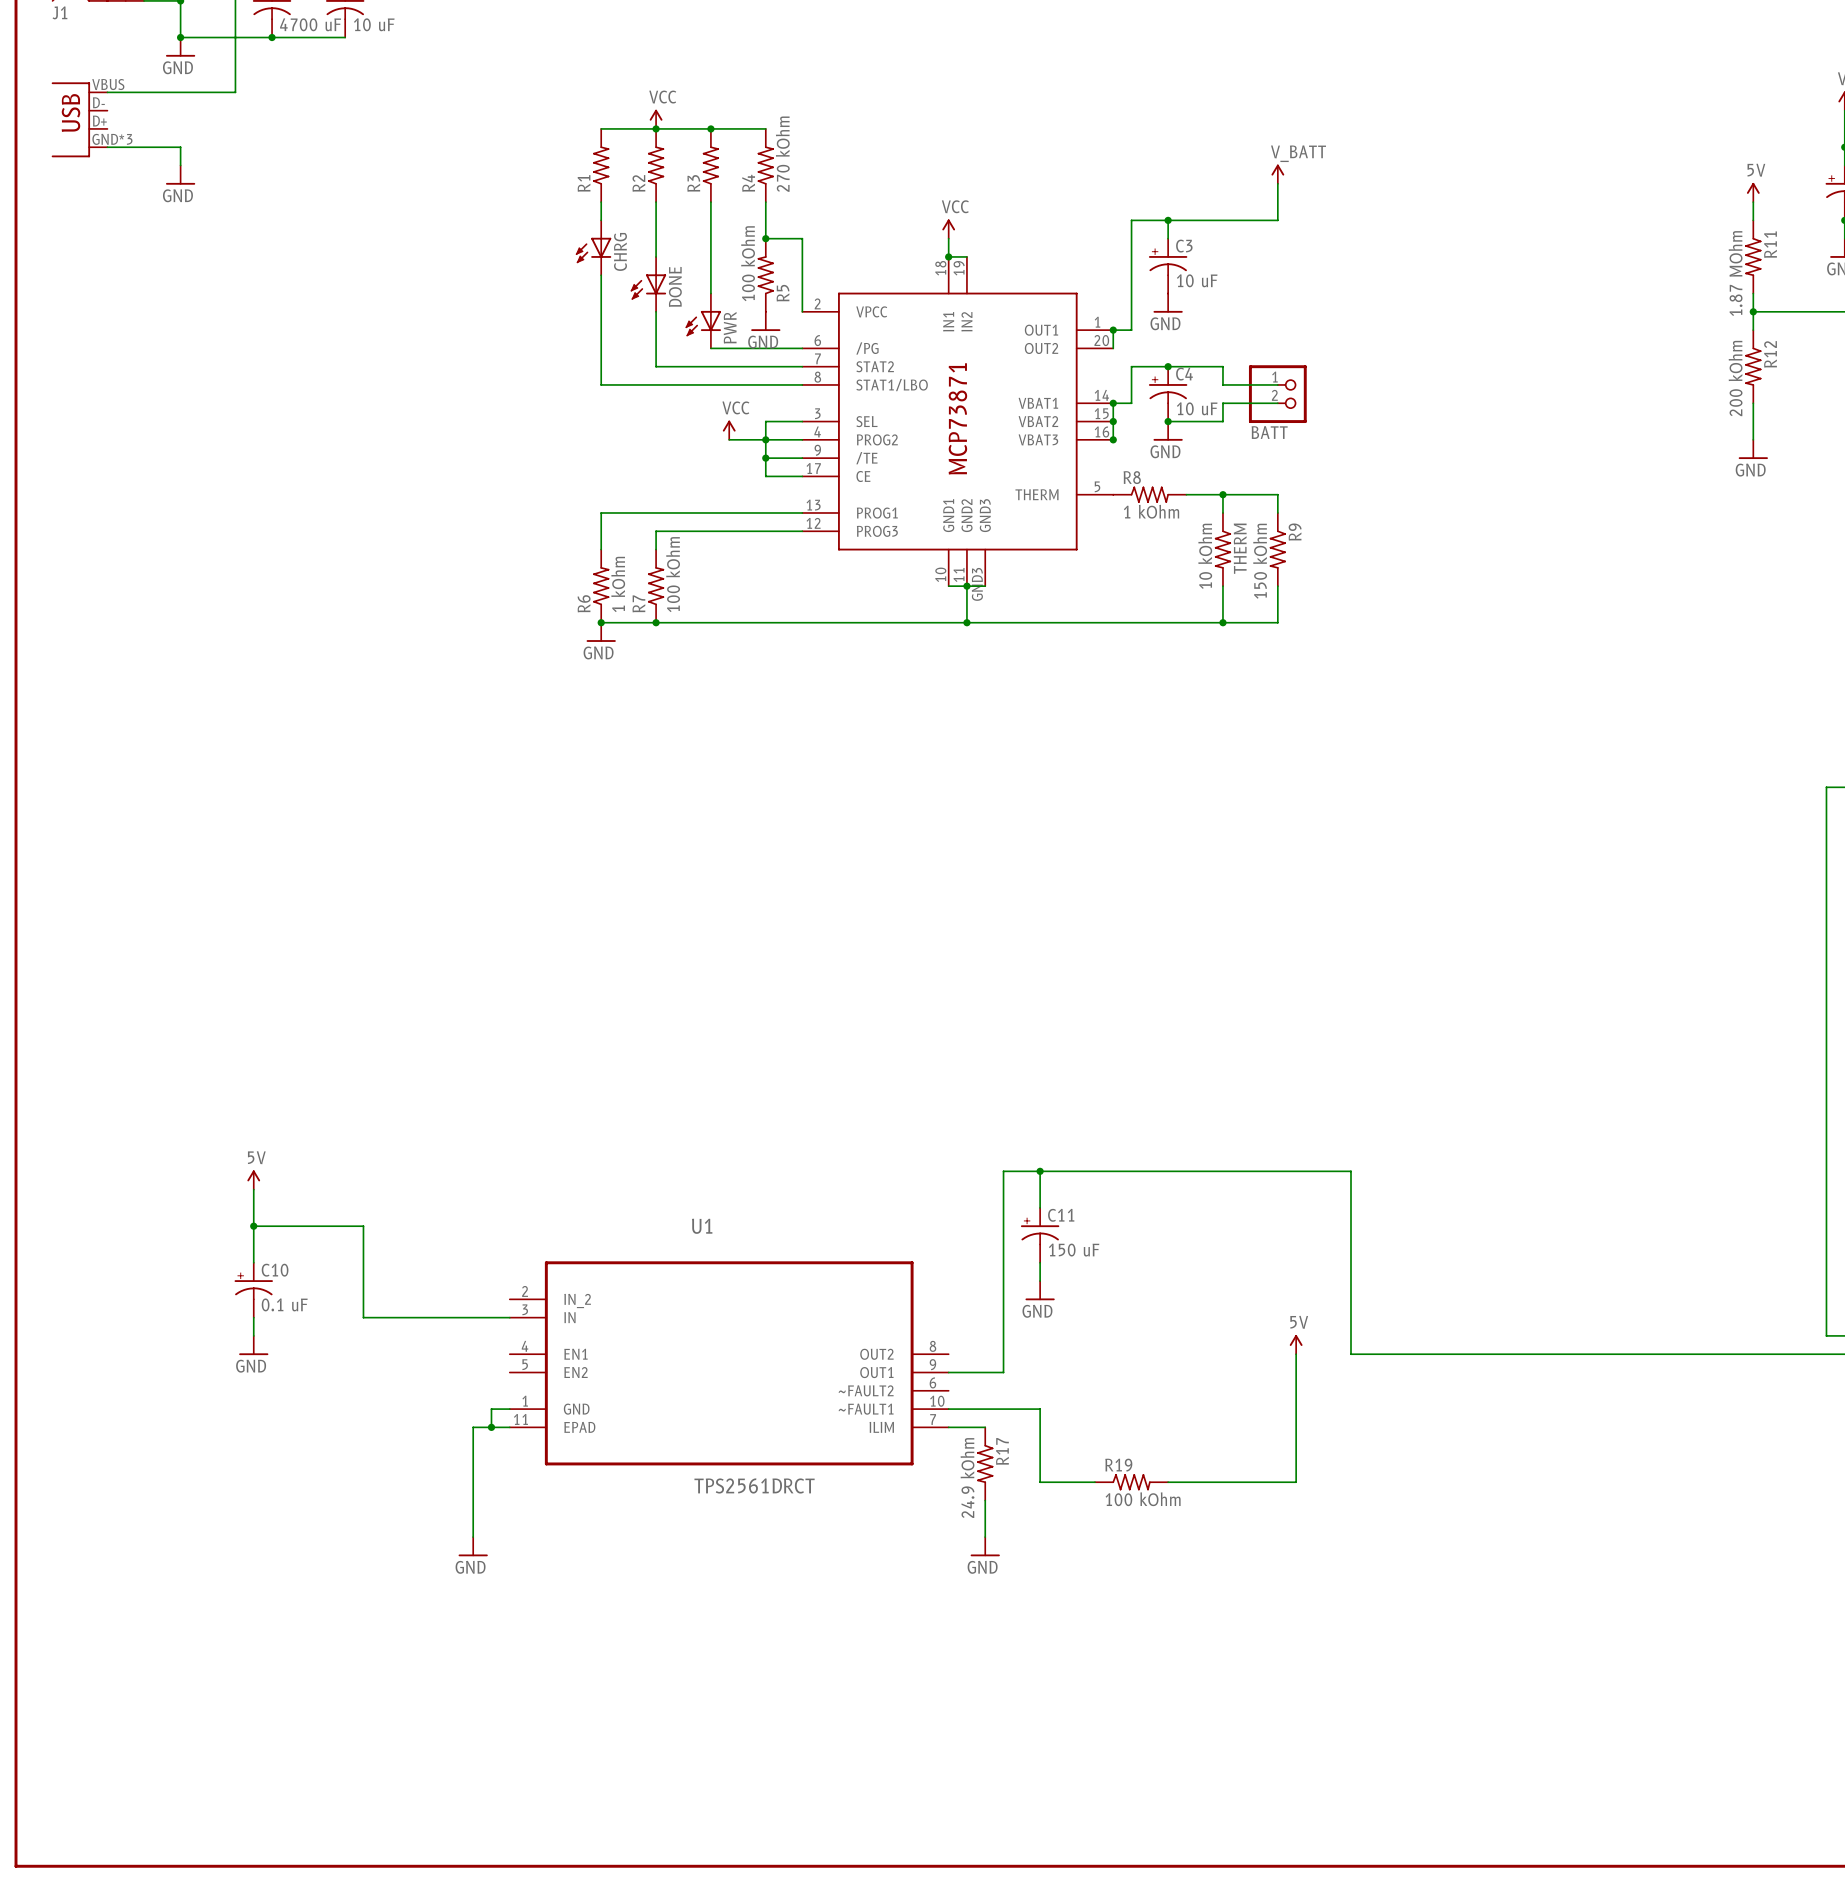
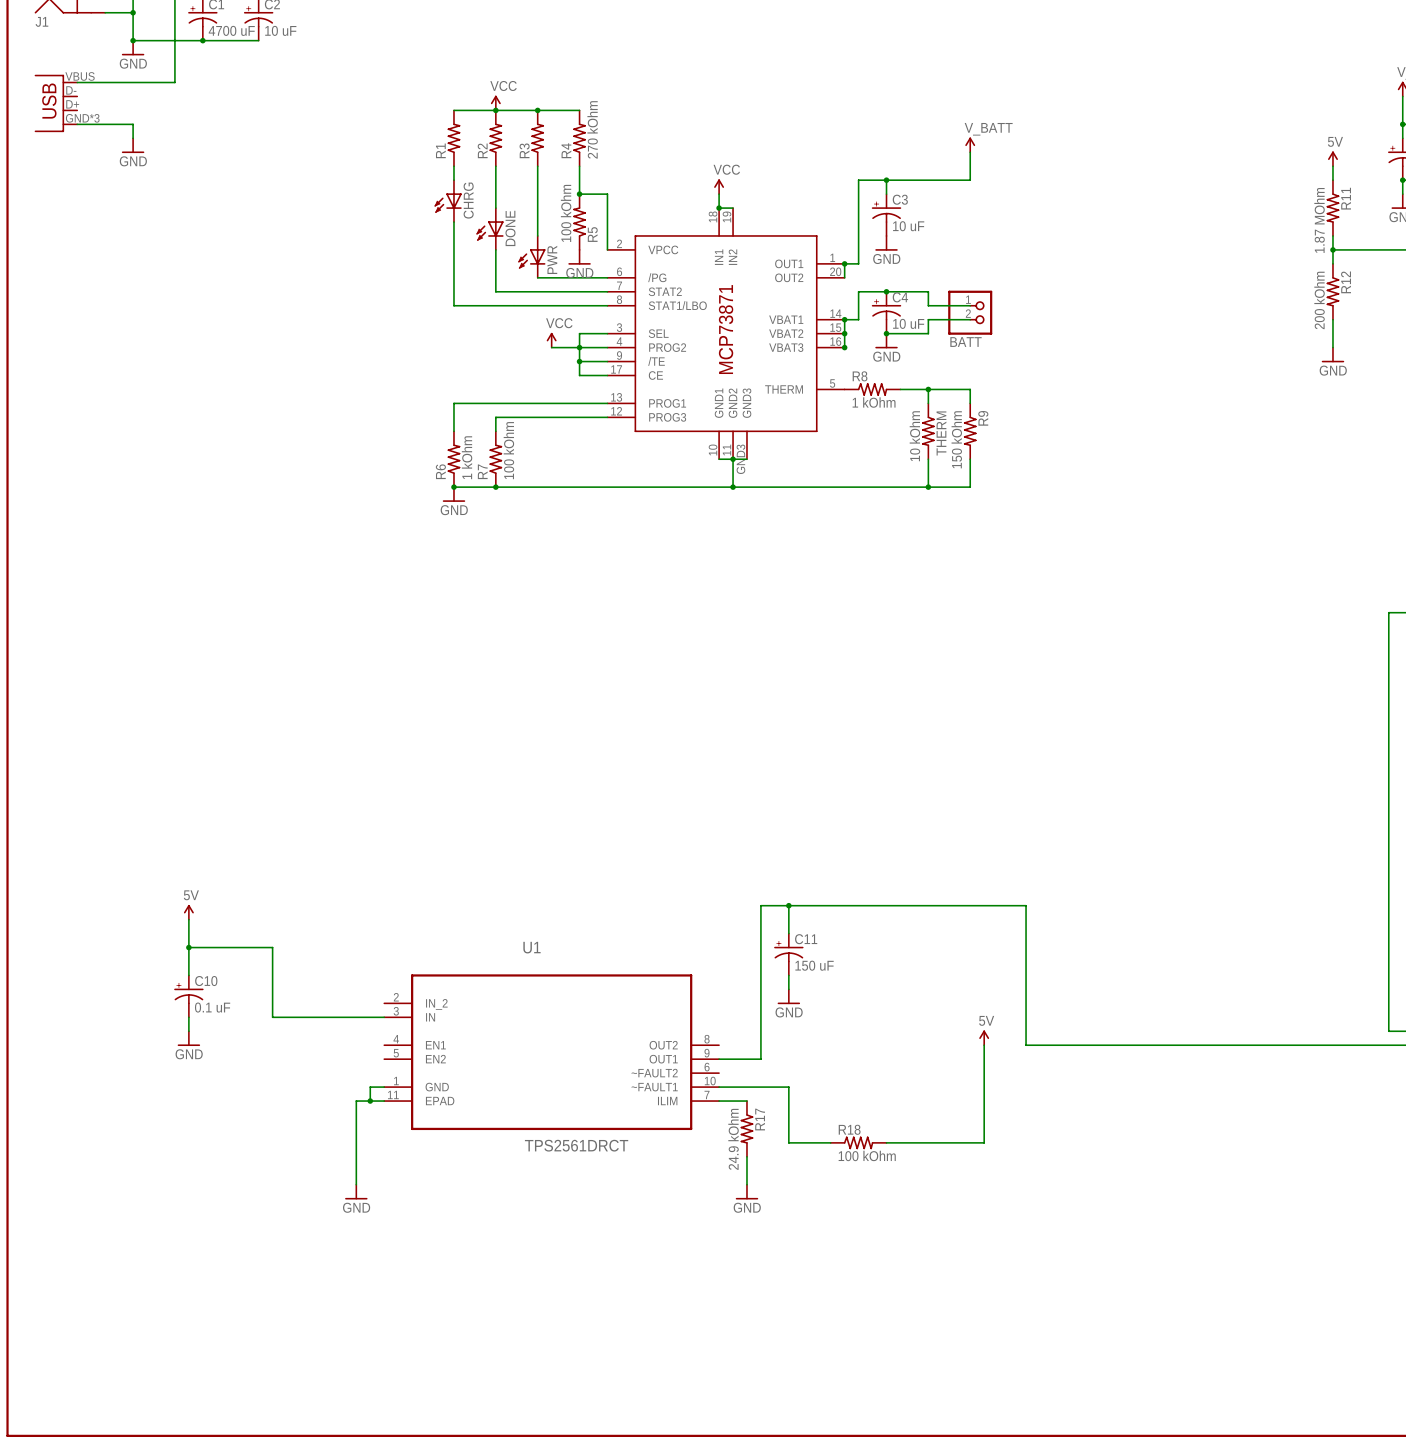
R19 name: R19 (1118, 1465) -> R18 (849, 1129)

